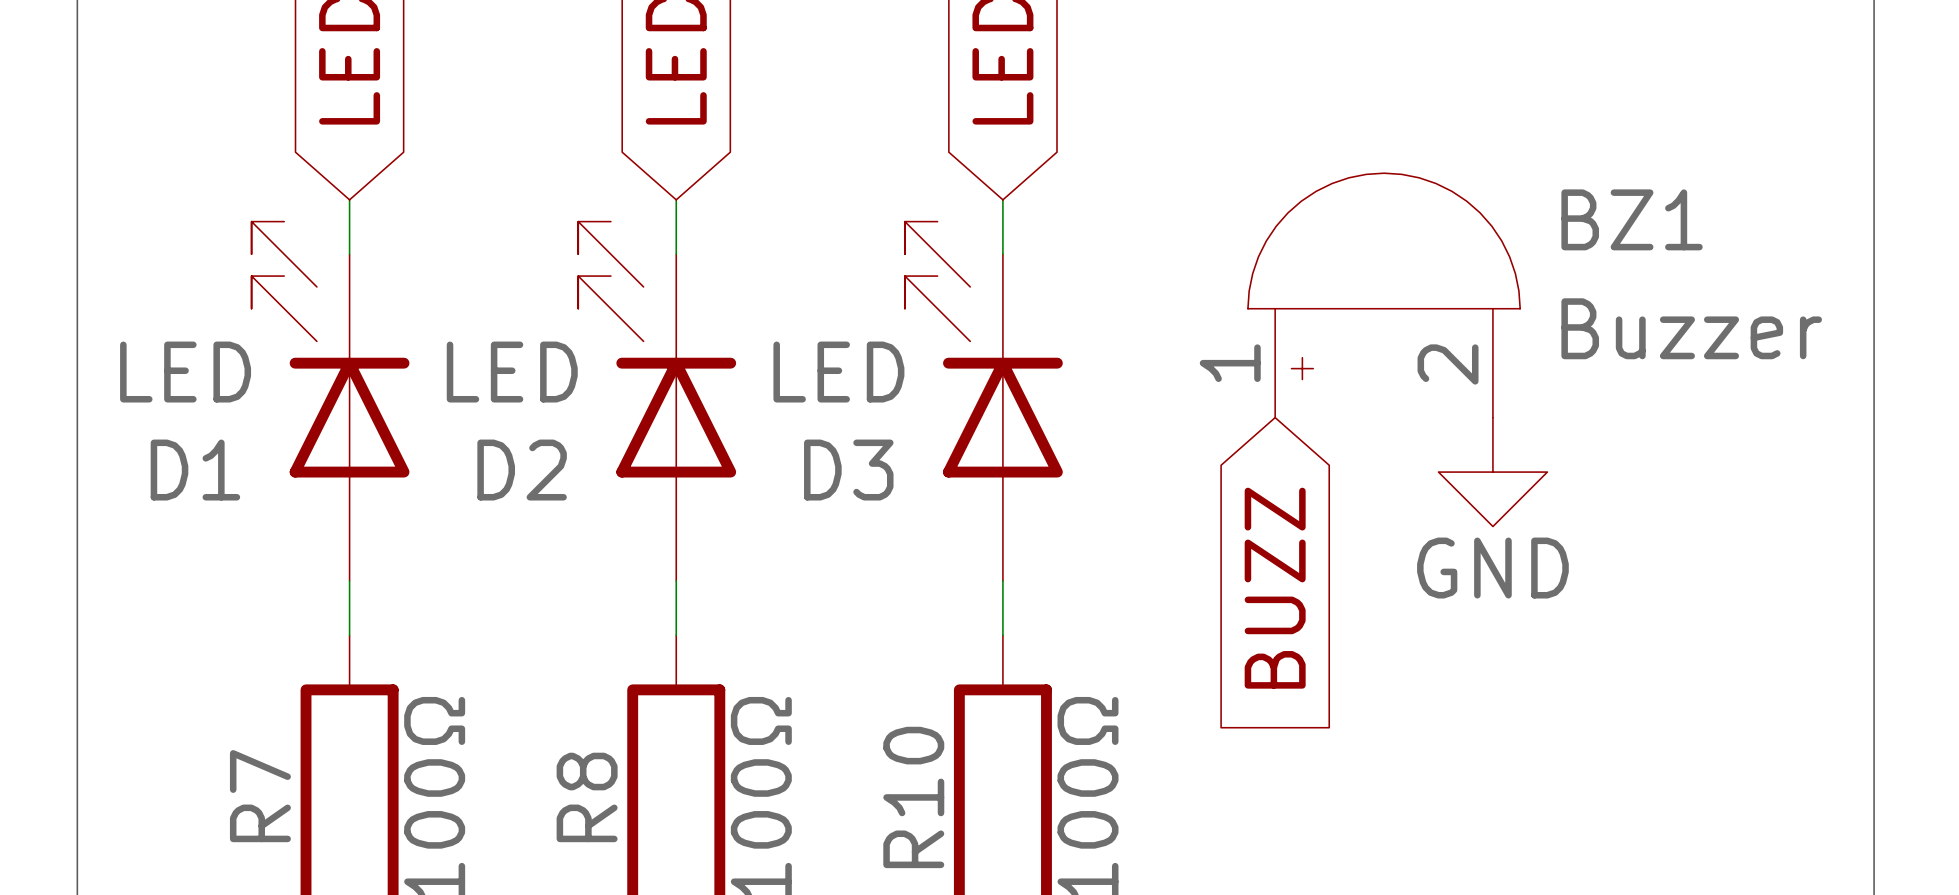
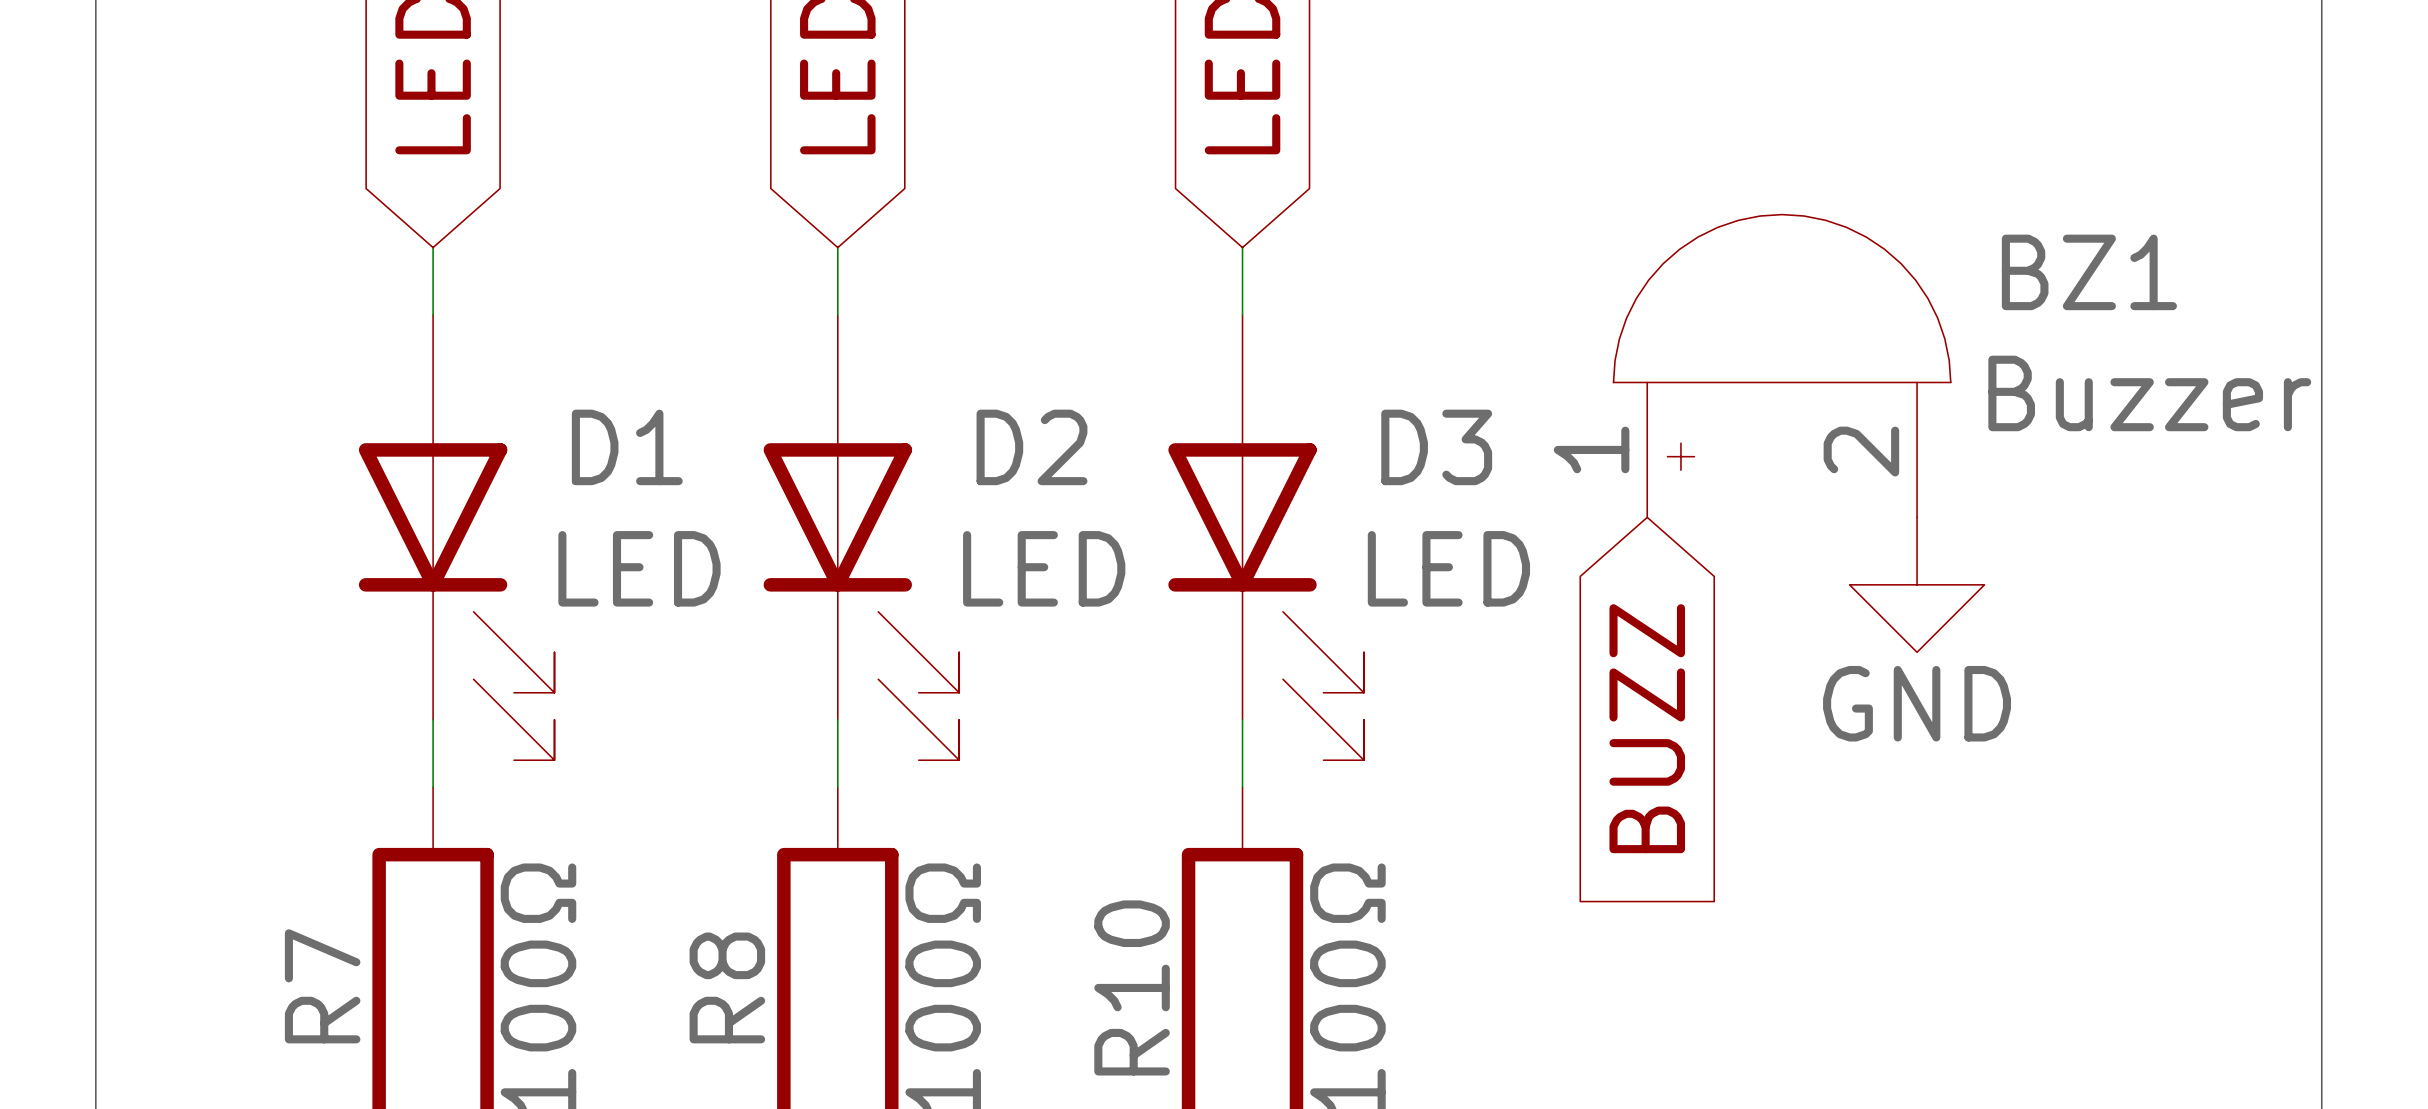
BZ1 position: (1384, 295) -> (1782, 365)
BZ1 value position: Buzzer (1691, 328) -> Buzzer (2149, 393)
D1 rotation: 0° (330, 349) -> 180° (456, 601)
D2 rotation: 0° (657, 349) -> 180° (861, 601)
D3 rotation: 0° (983, 349) -> 180° (1266, 601)
power symbol position: GND (1492, 472) -> GND (1917, 584)
global label position: BUZZ (1275, 588) -> BUZZ (1647, 728)

